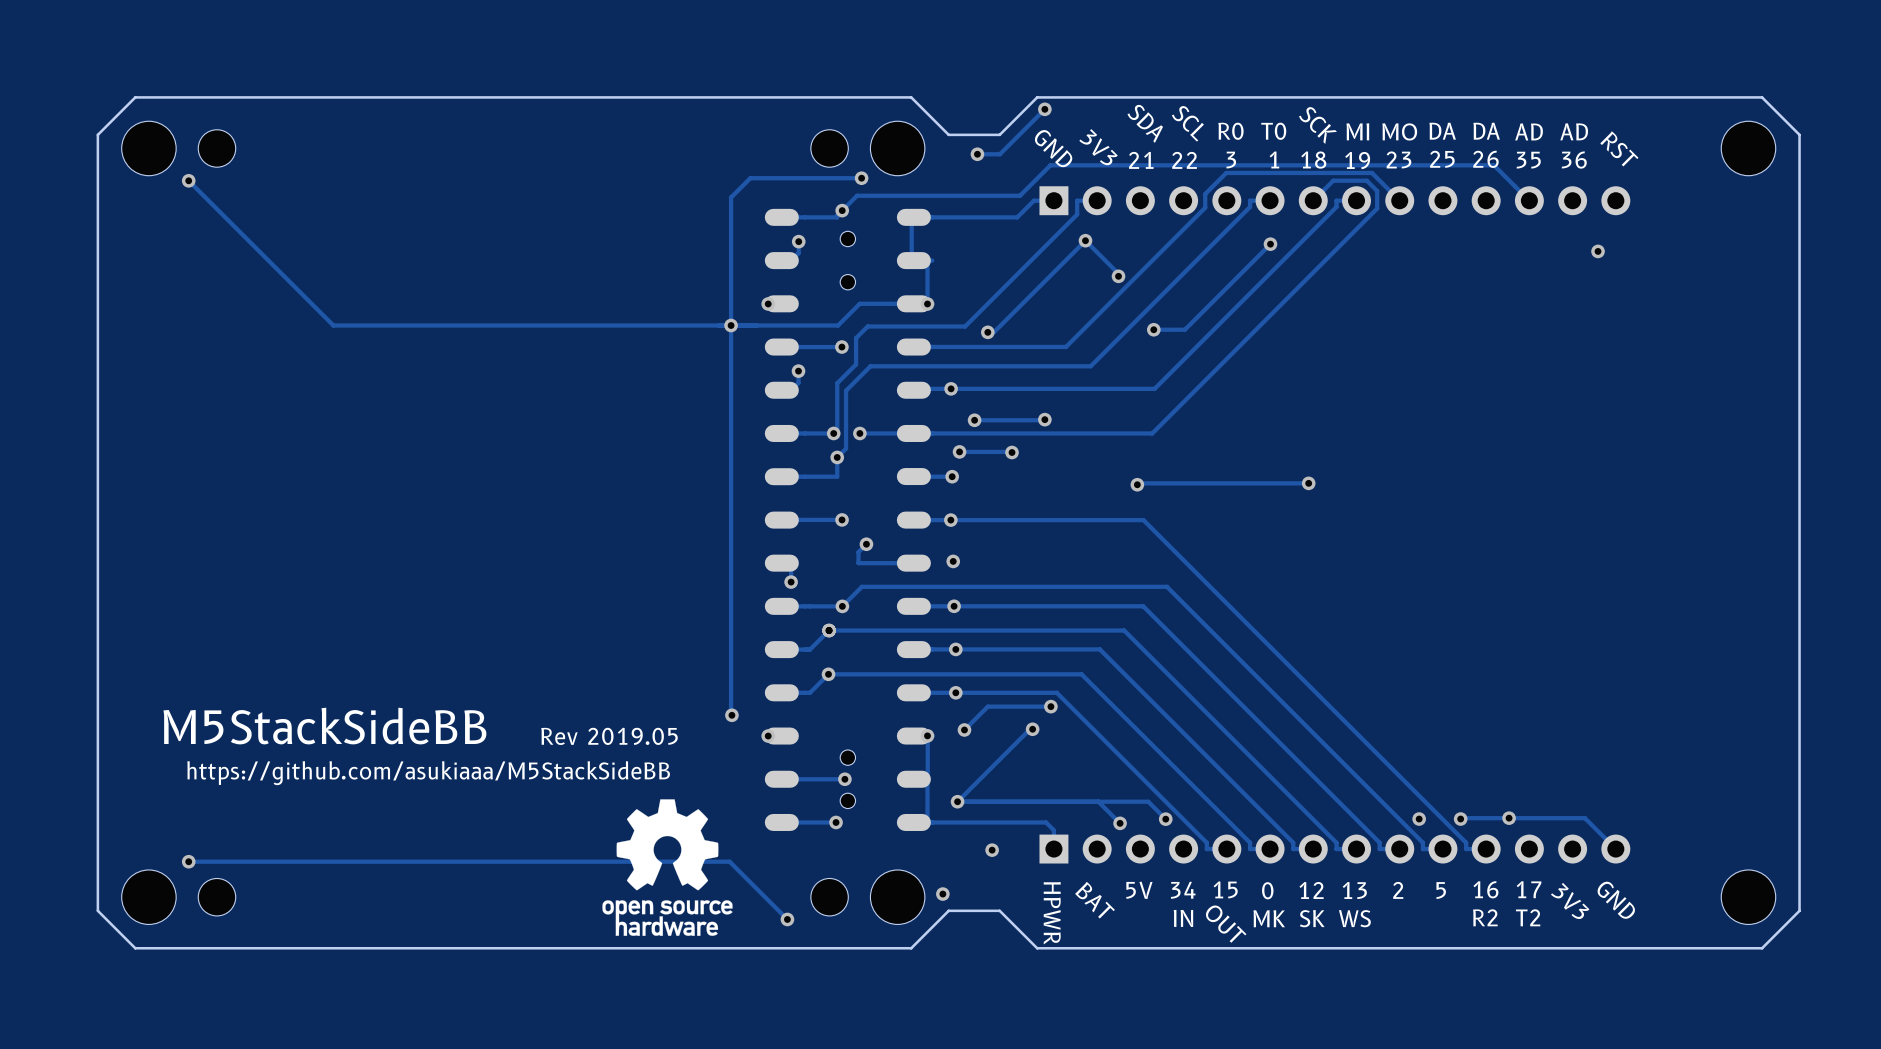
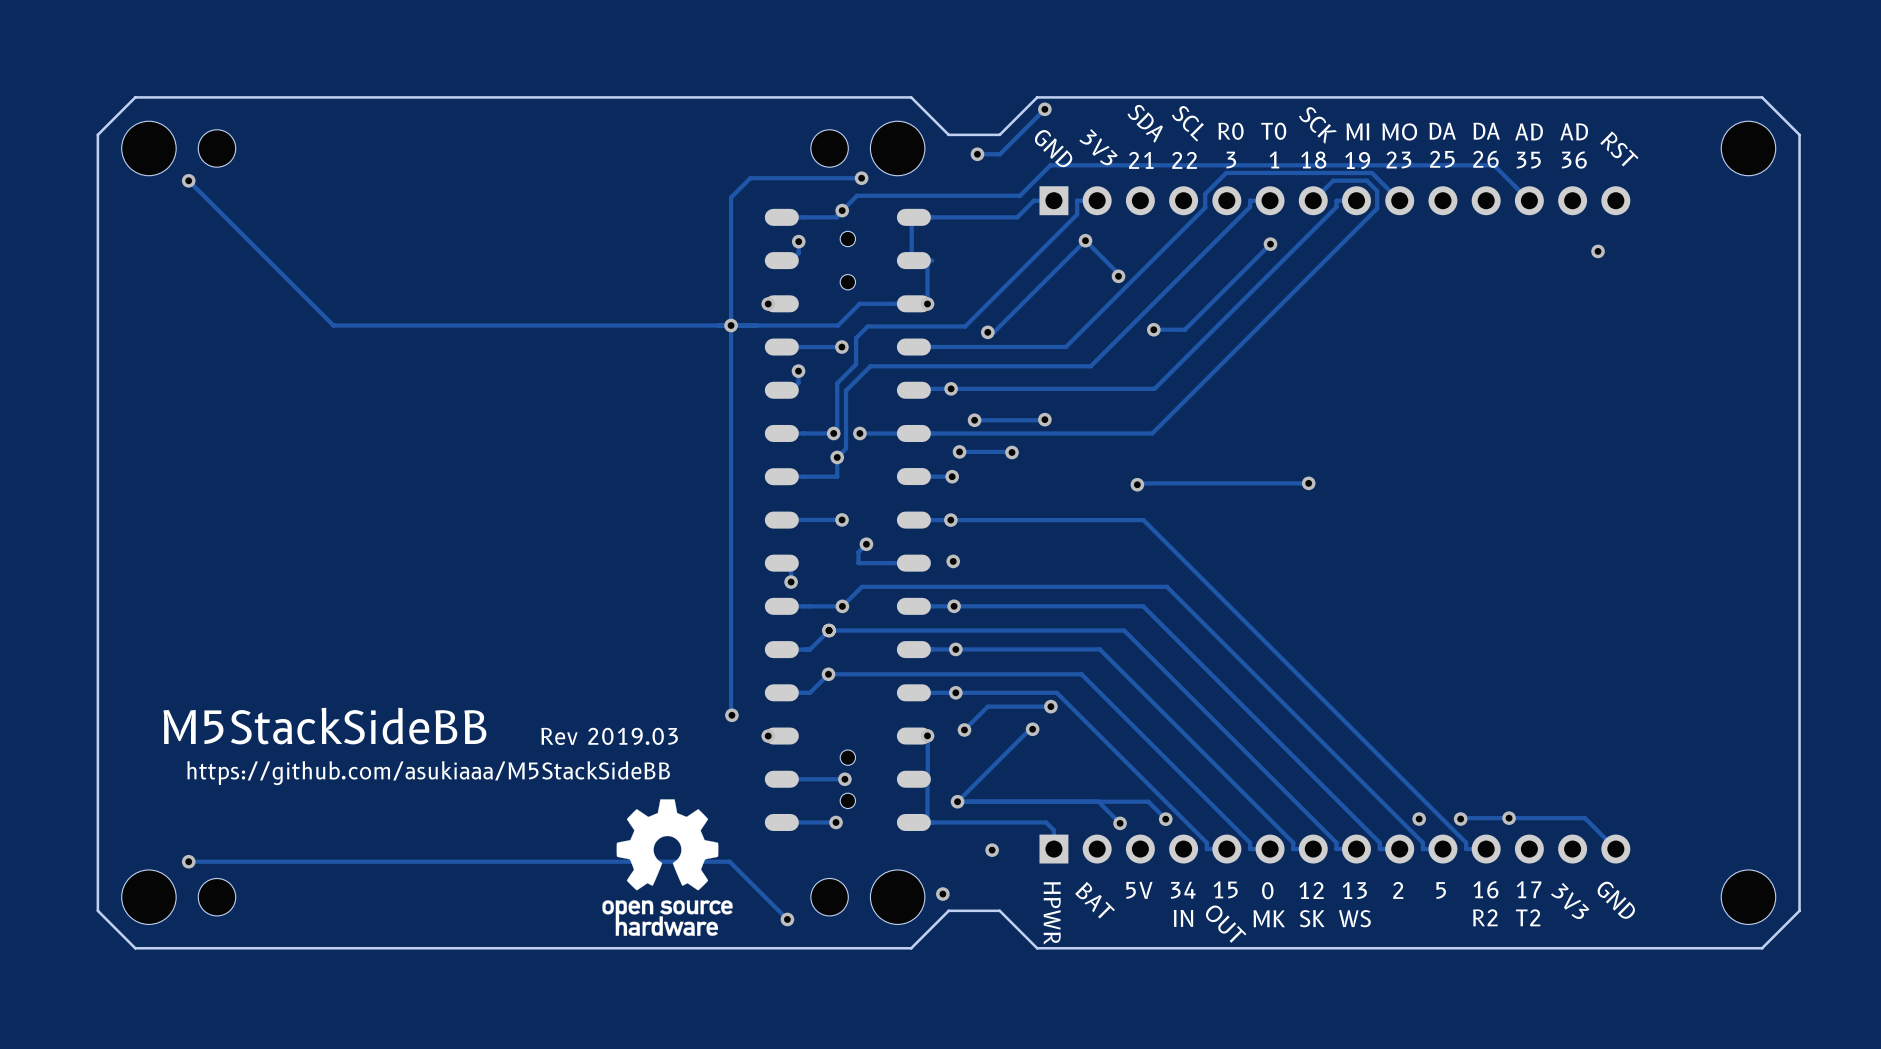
text: Rev 2019.05 (609, 736) -> Rev 2019.03 (609, 736)

